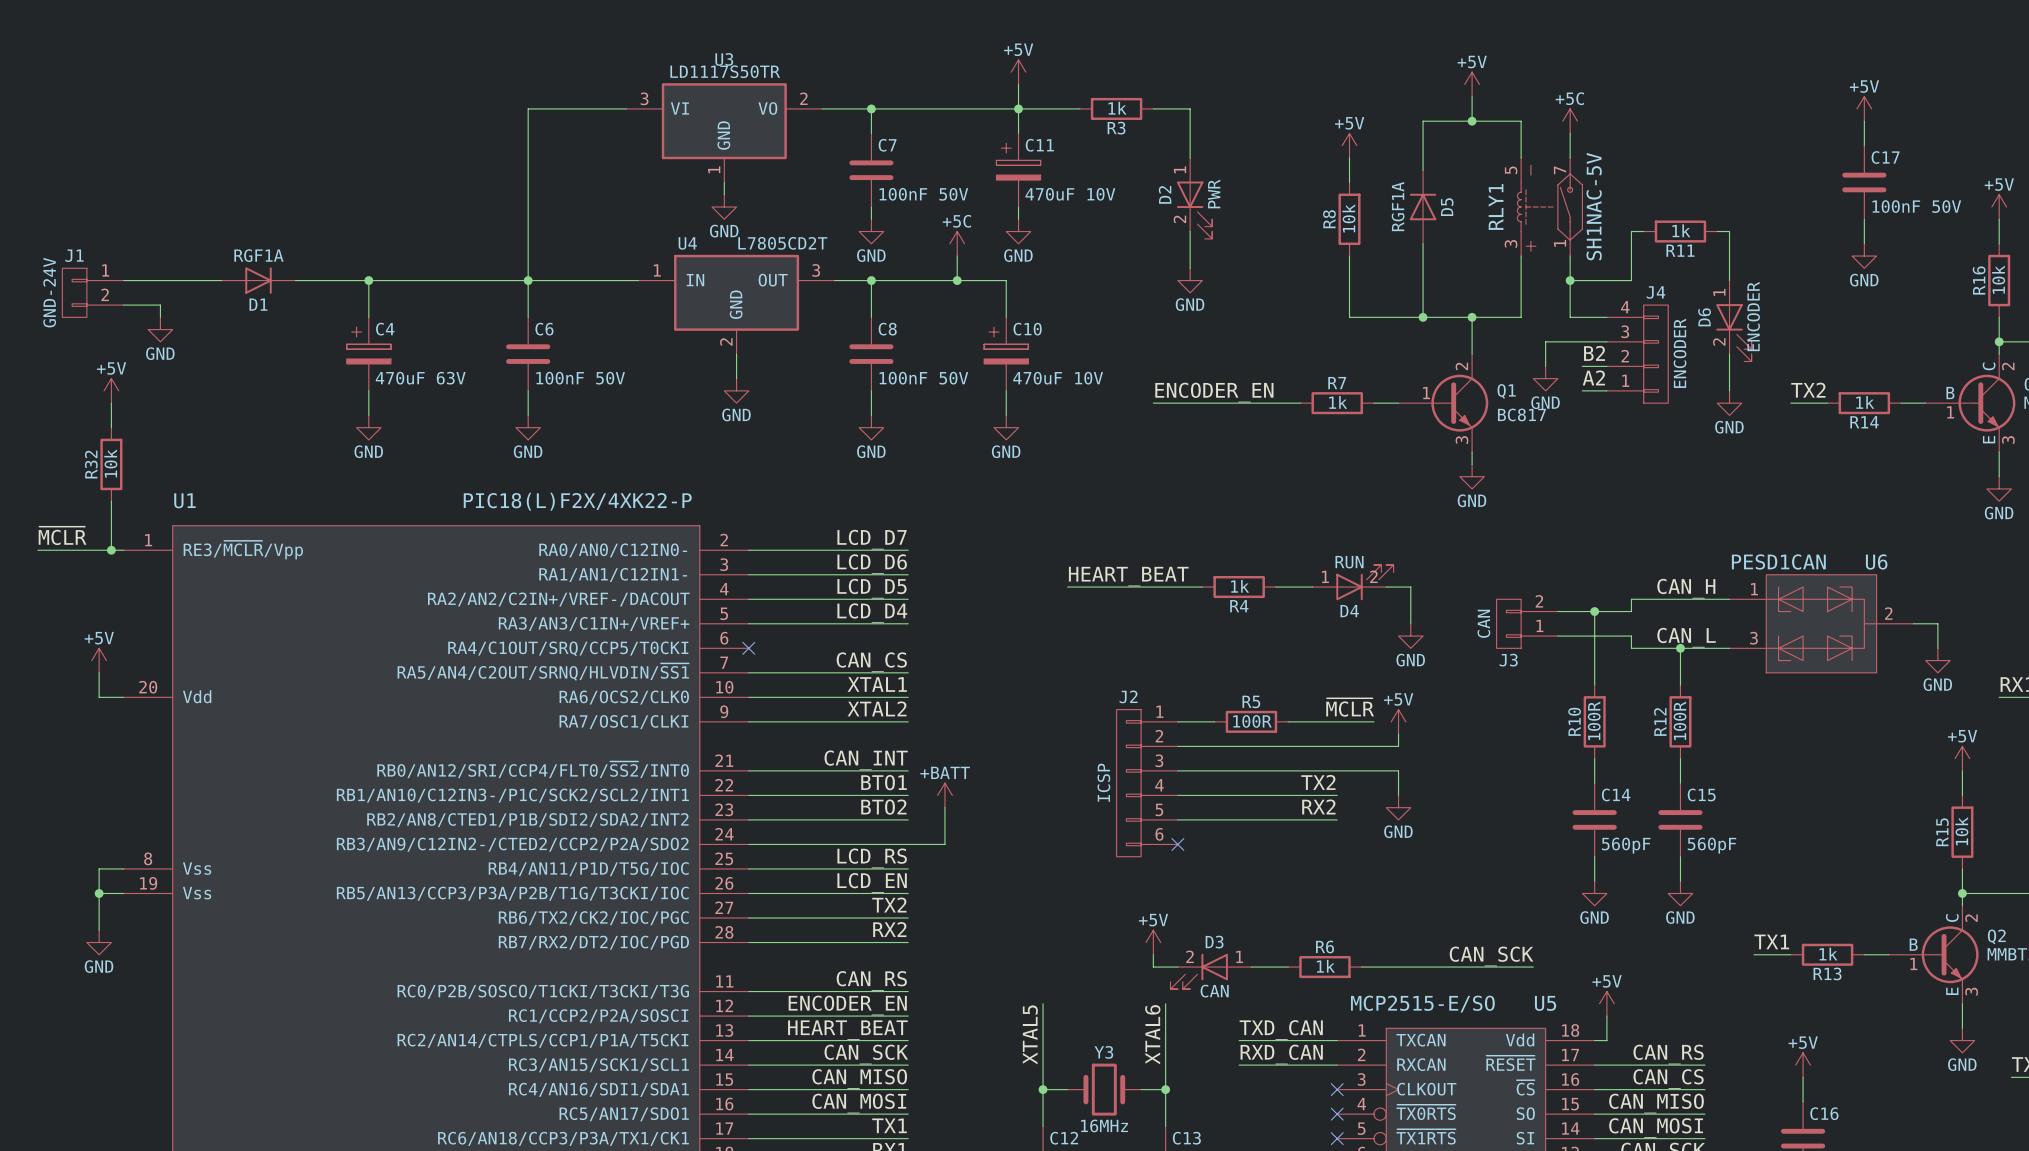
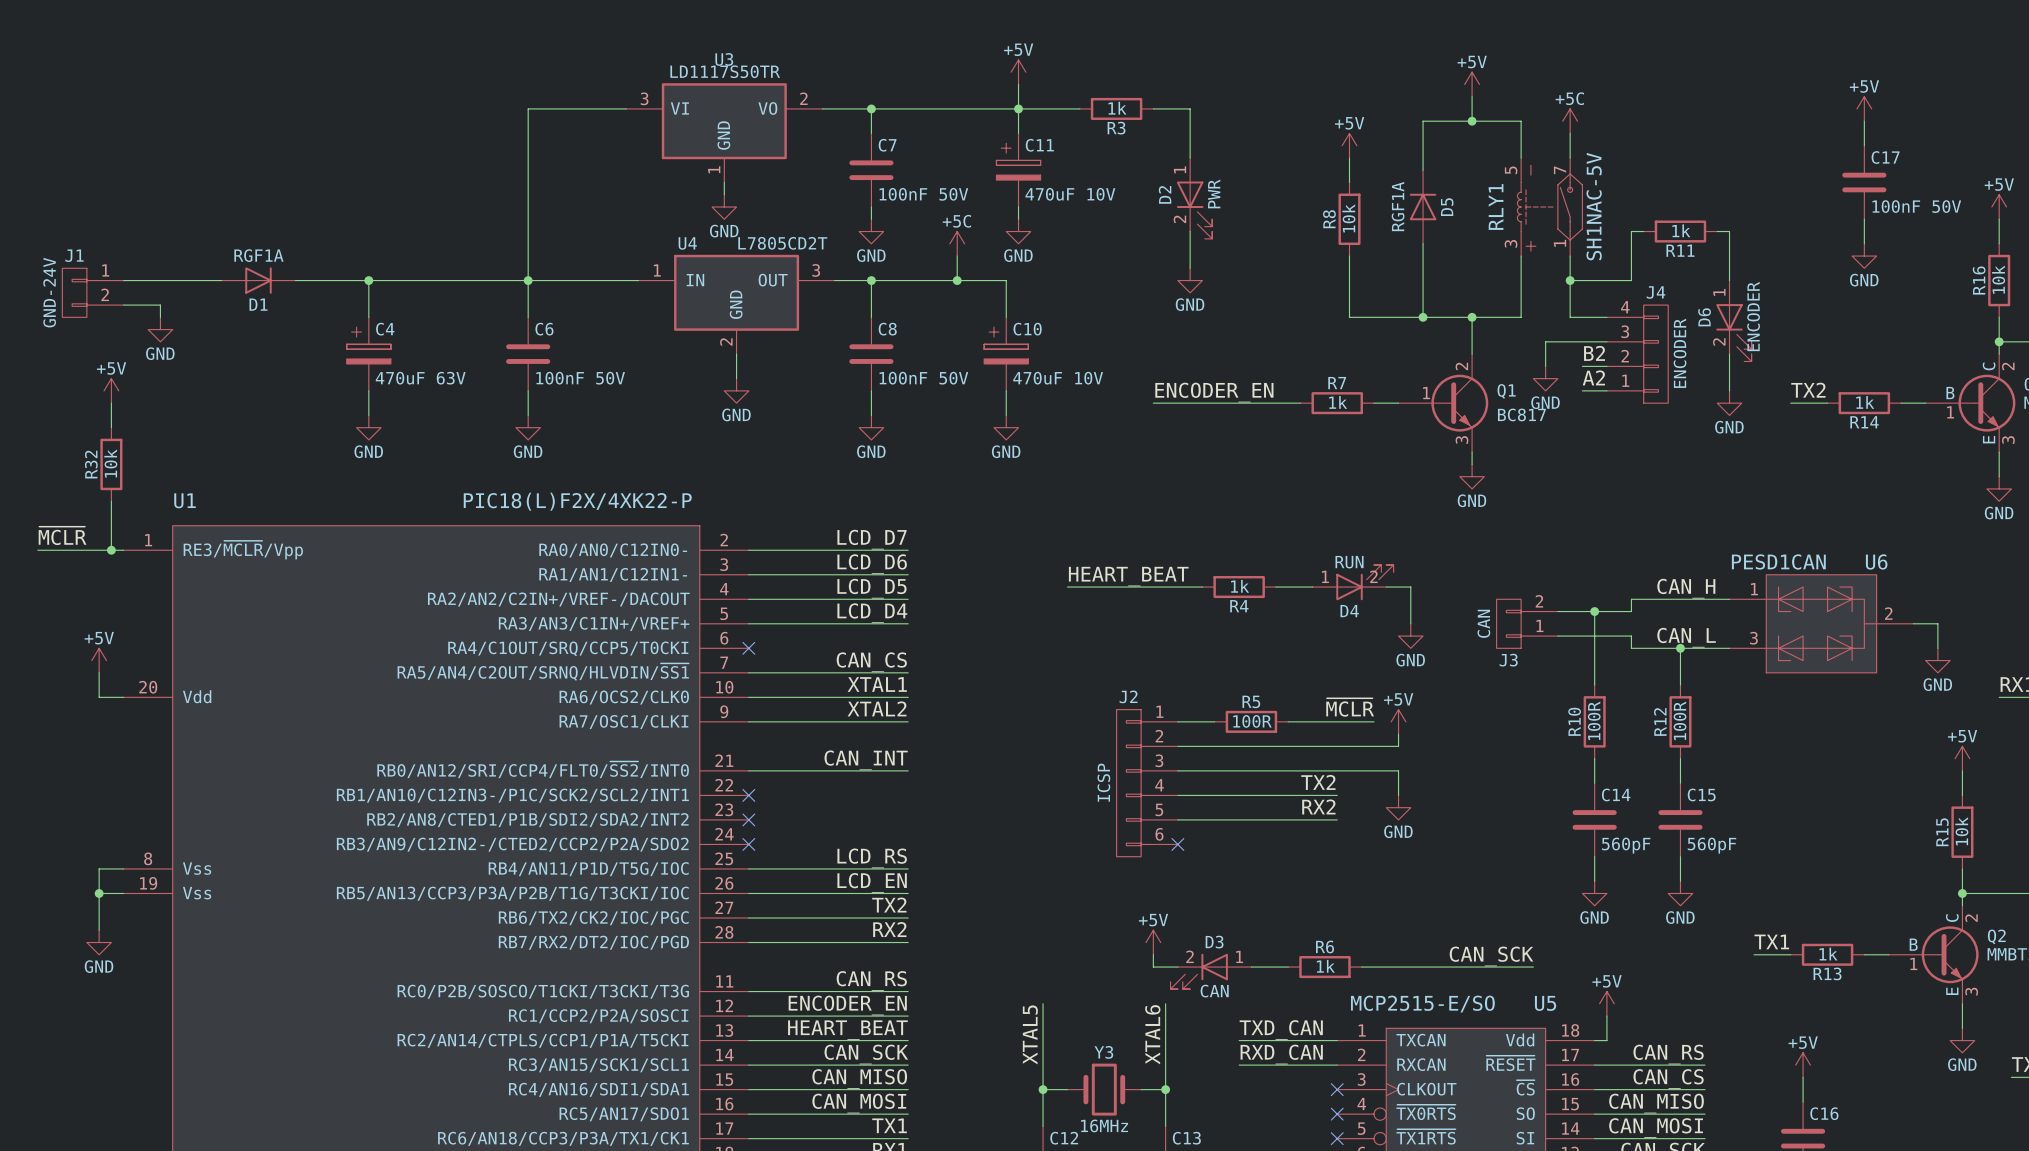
label: BTO1 (884, 782) -> none
wire: (748, 795) (908, 795) -> none
no-connect mark: none -> (748, 795)
power symbol: +BATT (944, 795) -> none
label: BTO2 (883, 807) -> none
wire: (944, 807) (944, 844) (748, 844) -> none
wire: (748, 819) (908, 819) -> none
no-connect mark: none -> (748, 819)
no-connect mark: none -> (748, 844)

